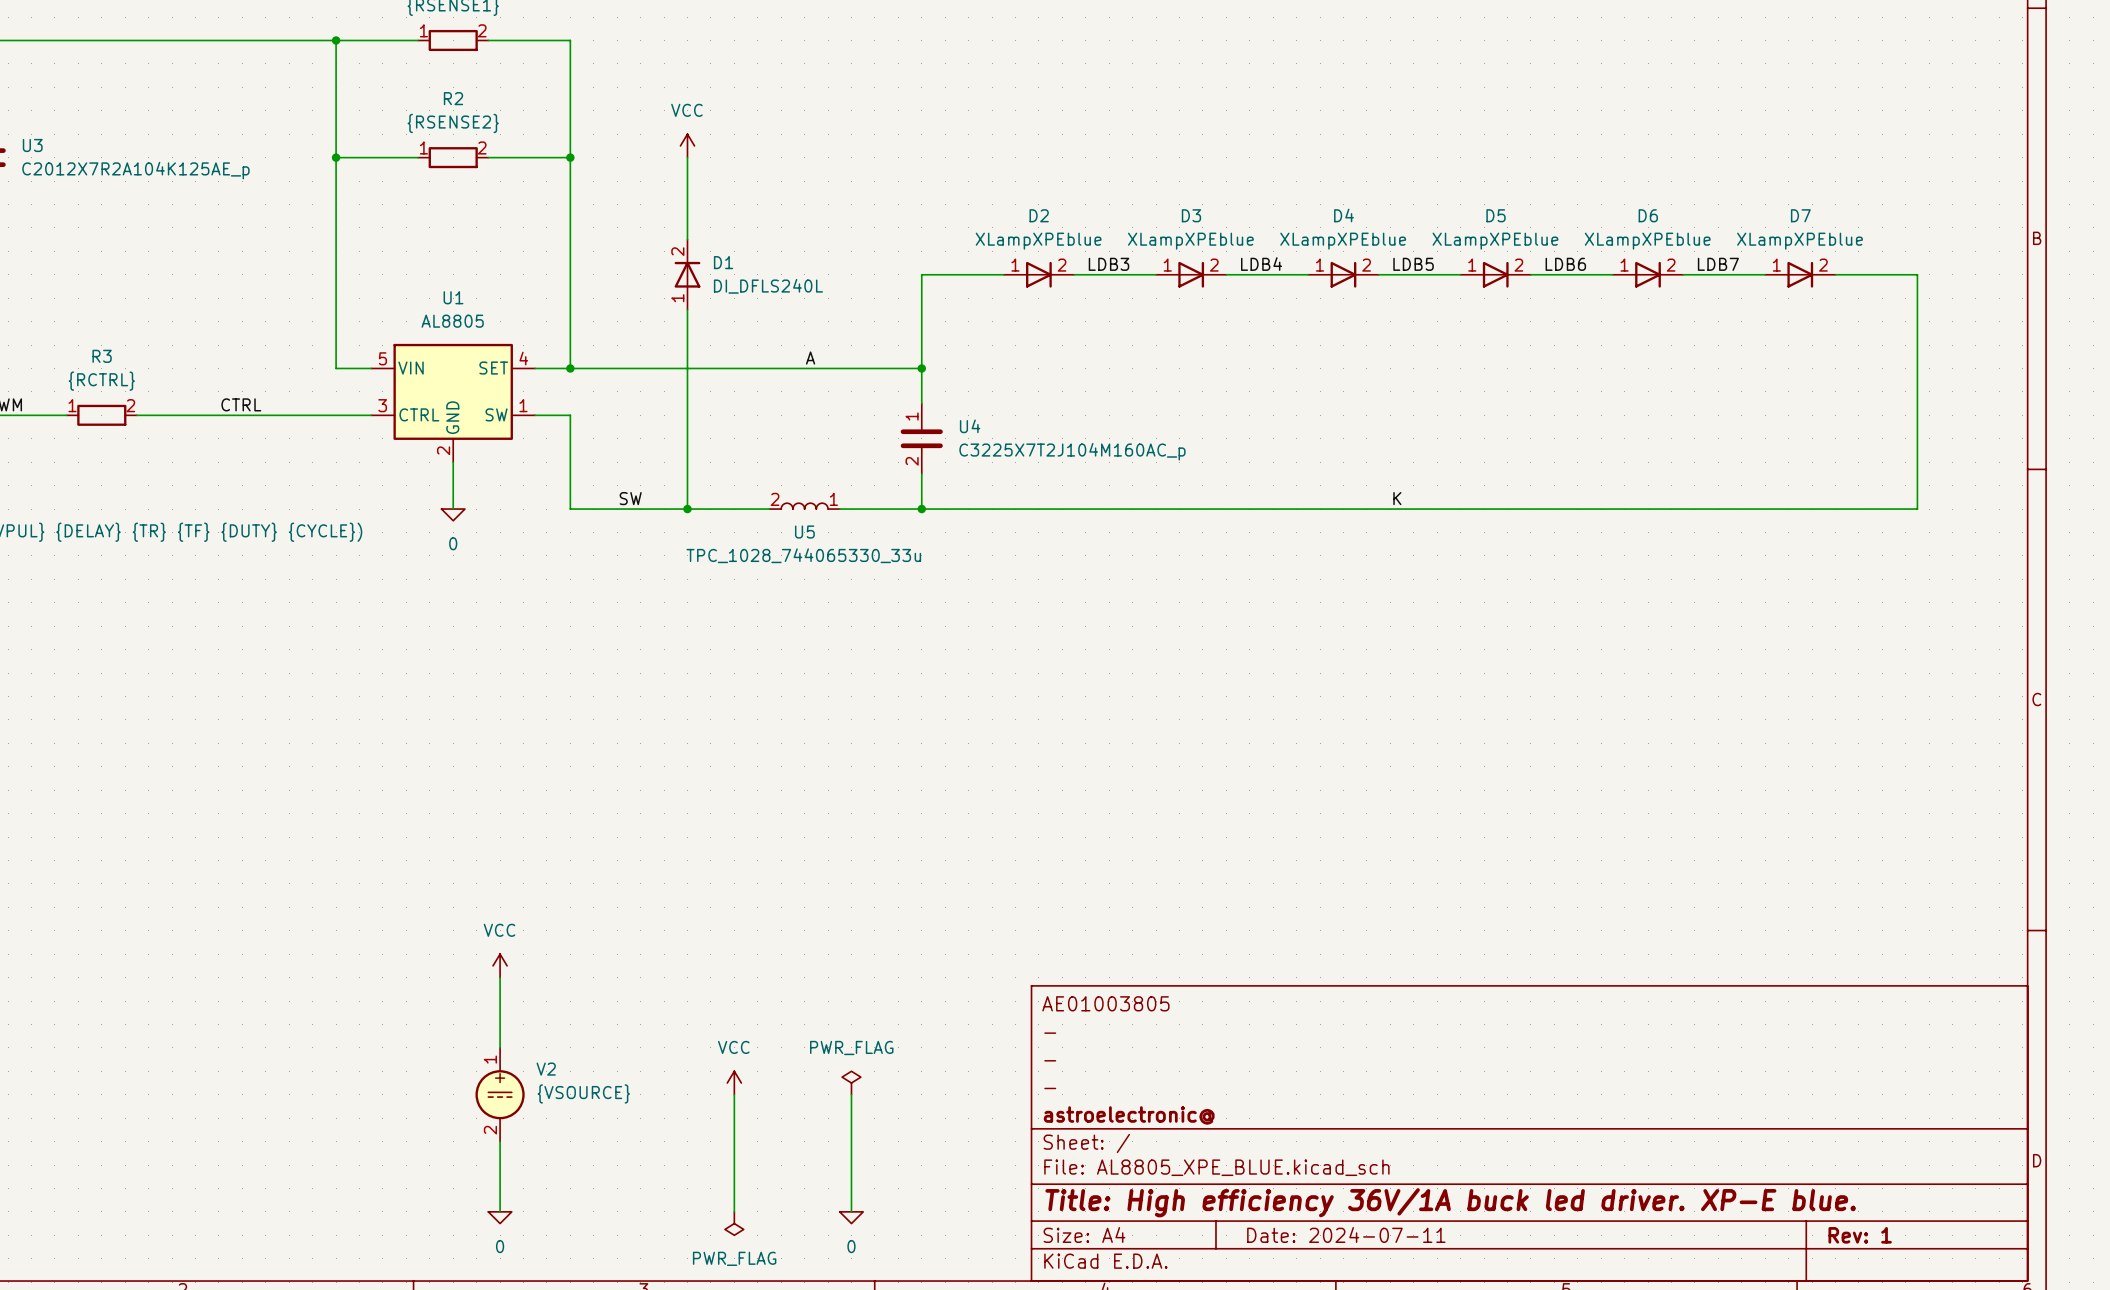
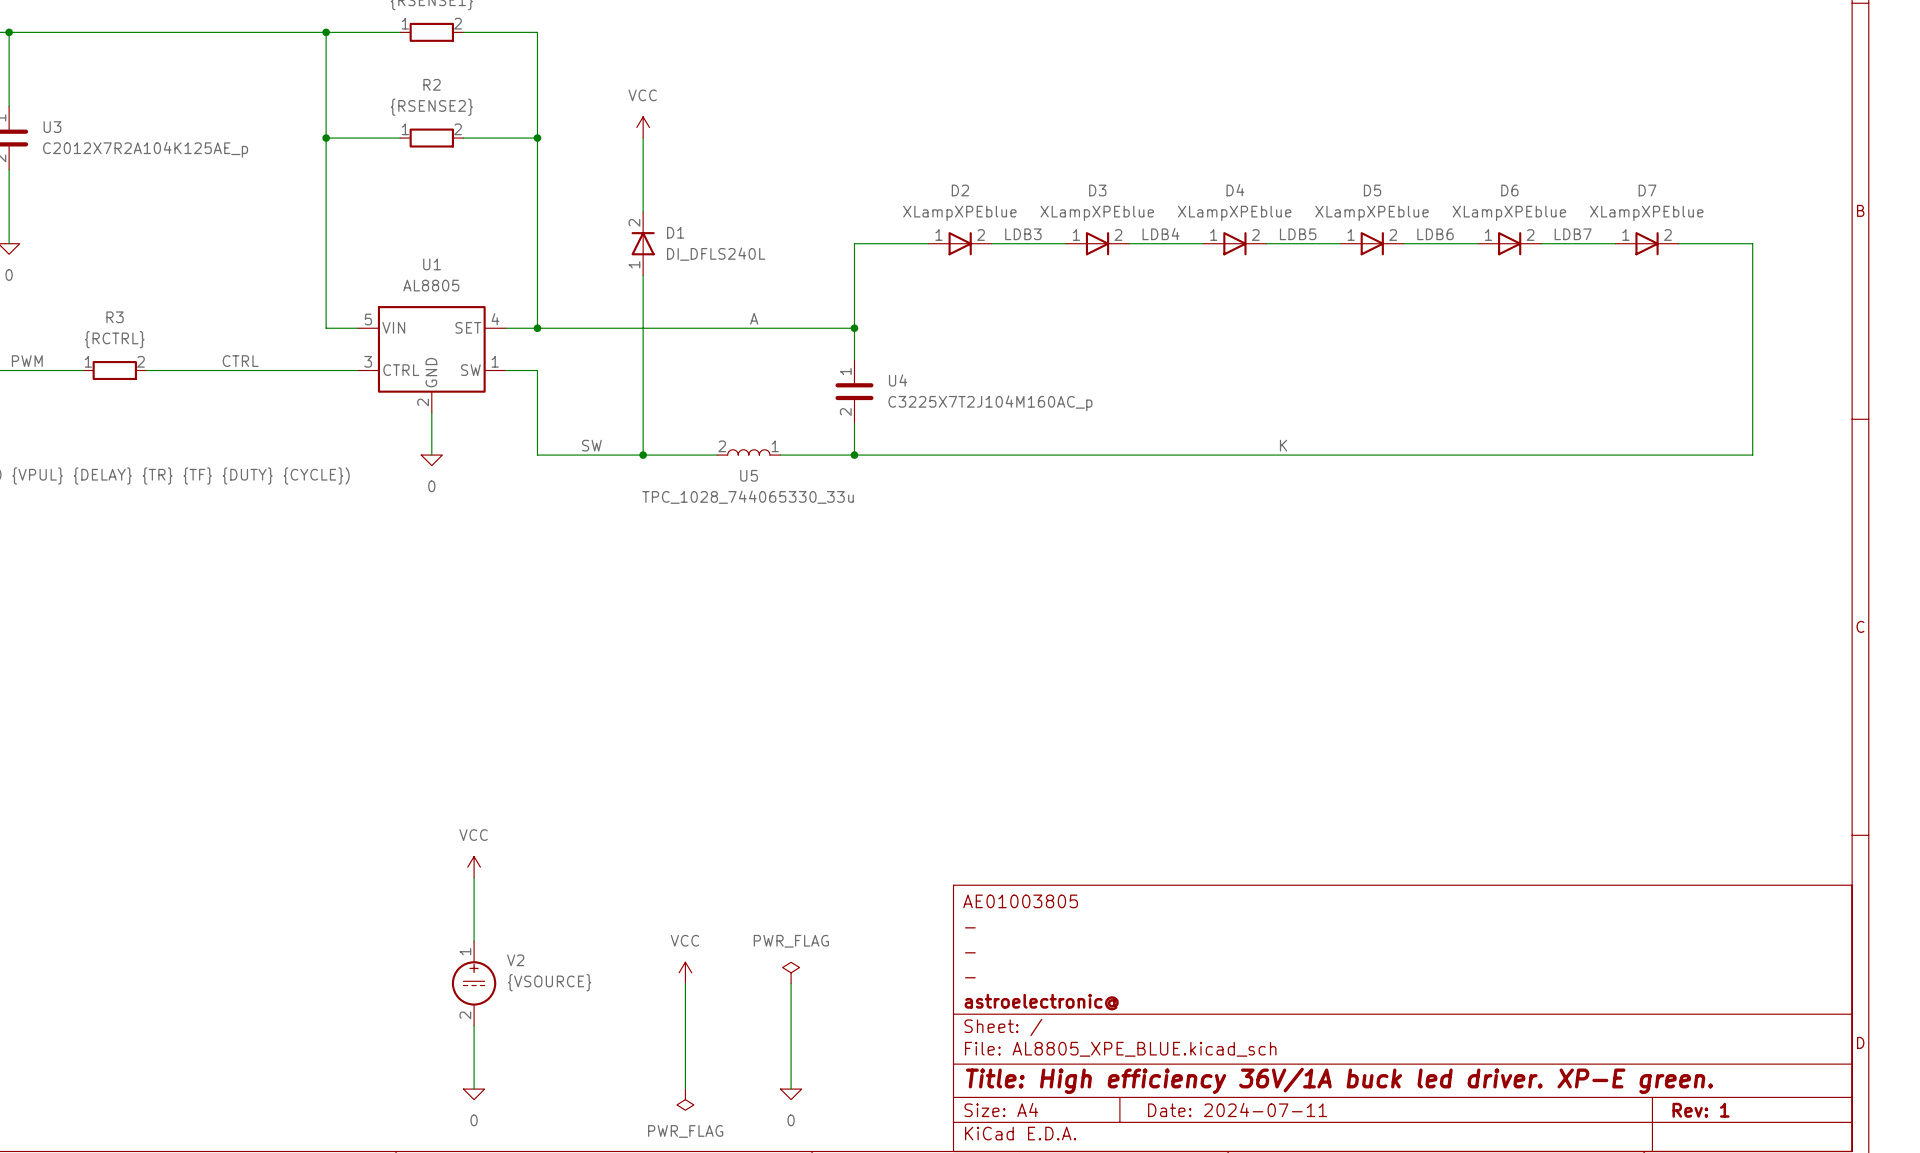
title block: Title: High efficiency 36V/1A buck led driver. XP-E blue. (1450, 1202) -> Title: High efficiency 36V/1A buck led driver. XP-E green. (1339, 1080)

